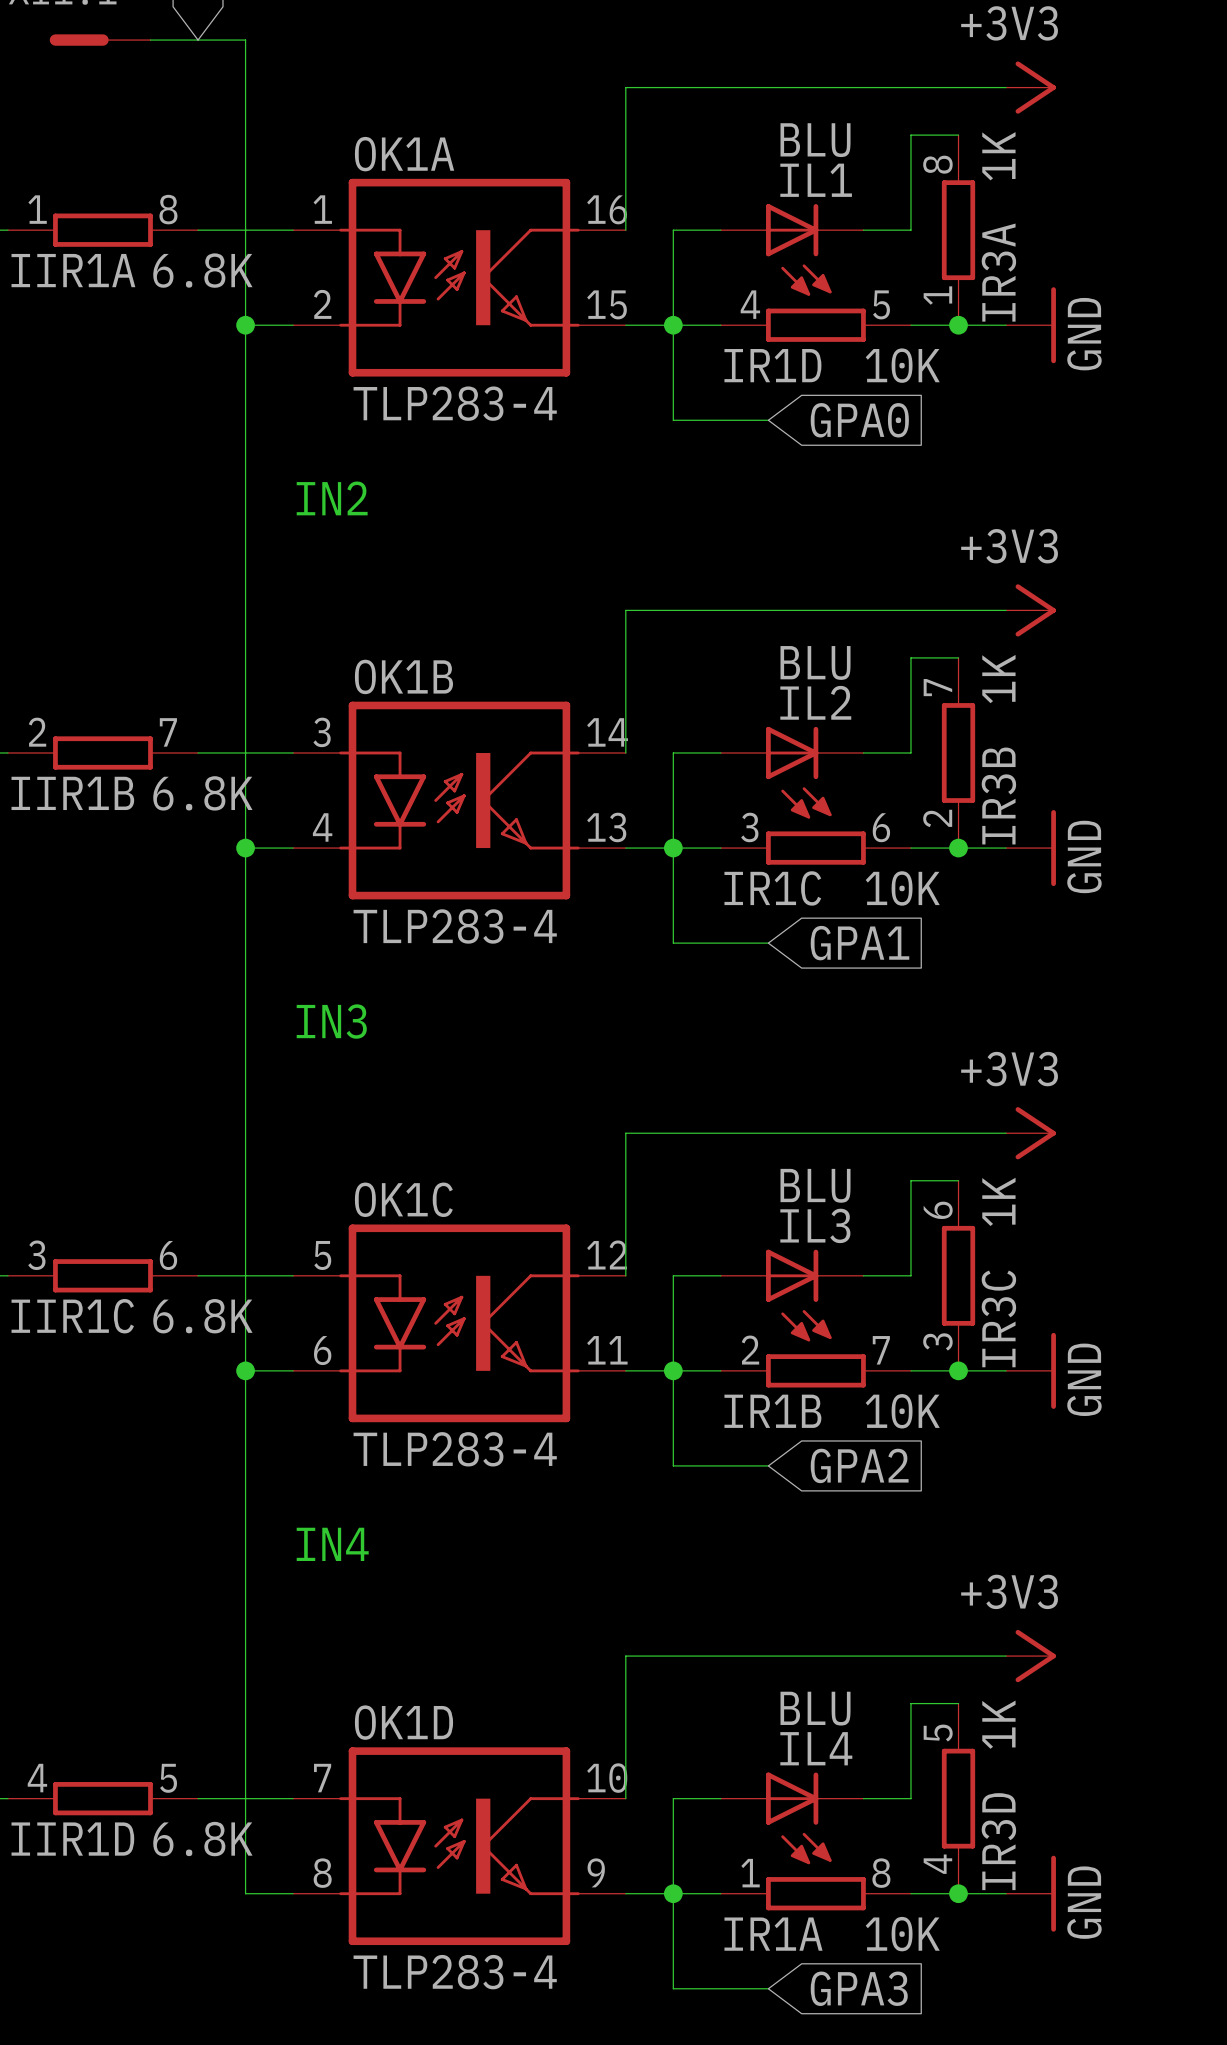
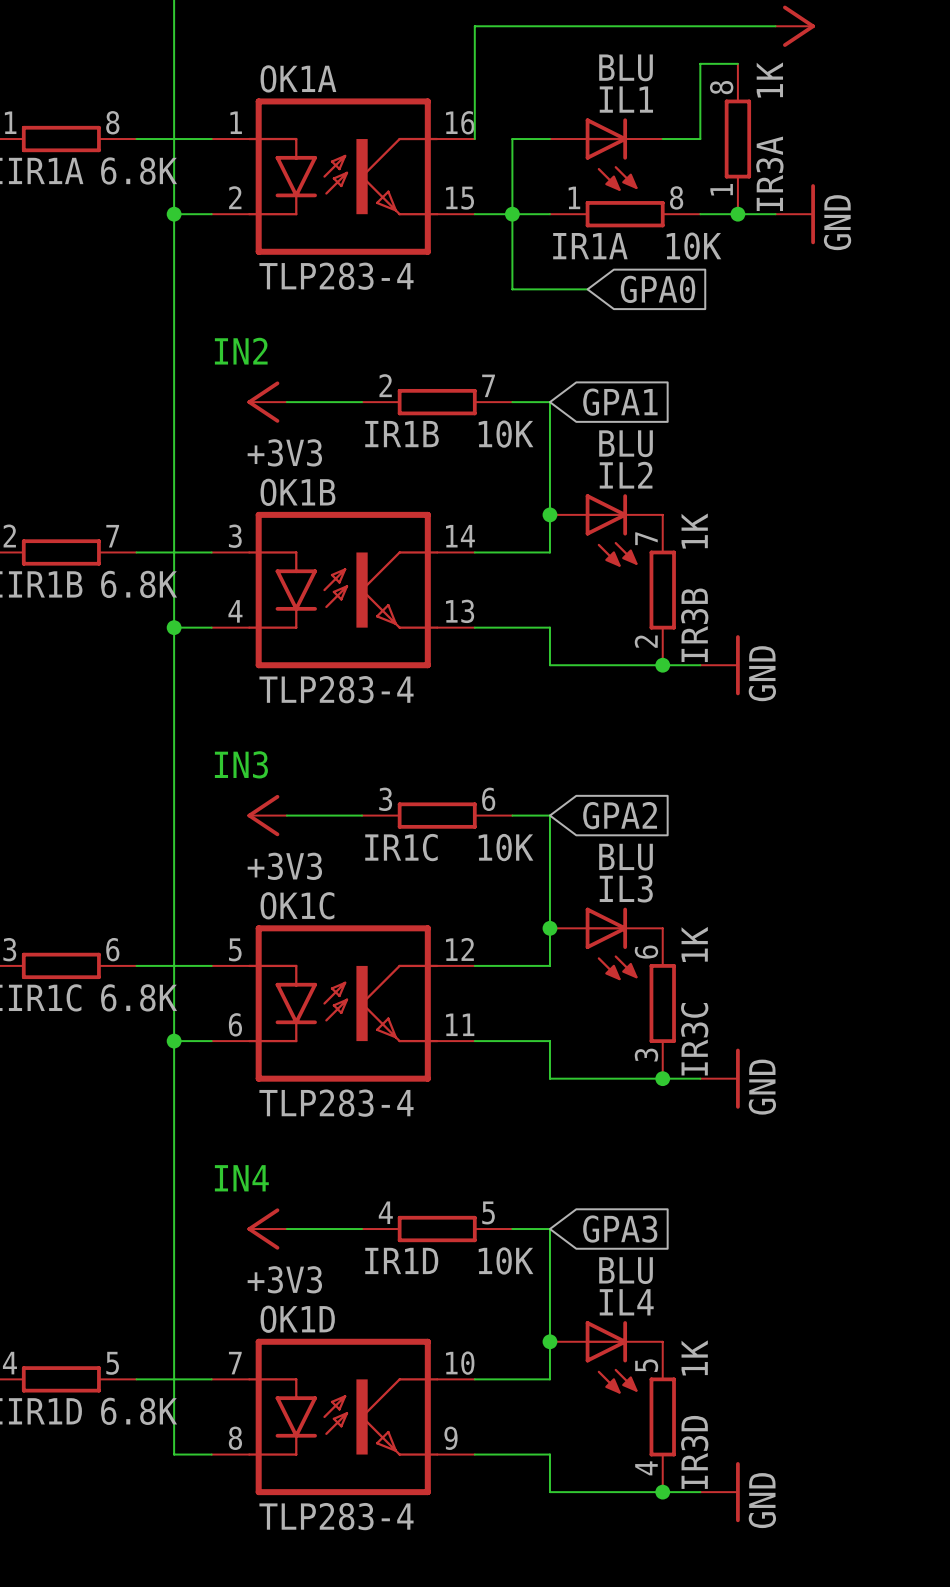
IR1D position: (815, 325) -> (437, 1229)
power symbol: none -> +3V3 (267, 402)
wire: none -> (286, 402) (362, 402)
wire: none -> (512, 402) (549, 402) (549, 552)
wire: (1006, 610) (625, 610) (625, 752) -> none
power symbol: +3V3 (1030, 610) -> none
wire: (958, 657) (910, 657) (910, 752) (863, 752) -> none
junction: none -> (549, 514)
wire: (673, 752) (673, 943) (768, 943) -> (512, 552) (474, 552)
IR3B position: (958, 752) -> (662, 590)
IL2 position: (792, 772) -> (606, 530)
junction: (673, 848) -> none
wire: none -> (549, 627) (549, 665) (700, 665)
IR1C position: (815, 848) -> (437, 815)
wire: (910, 848) (1006, 848) -> none
junction: (958, 848) -> none
power symbol position: GND (1030, 848) -> GND (720, 665)
junction: none -> (662, 665)
global label position: GPA1 (859, 943) -> GPA1 (620, 402)
power symbol: none -> +3V3 (267, 815)
wire: none -> (286, 815) (362, 815)
wire: none -> (512, 815) (549, 815) (549, 965)
wire: (1006, 1133) (625, 1133) (625, 1275) -> none
power symbol: +3V3 (1030, 1133) -> none
wire: (958, 1180) (910, 1180) (910, 1275) (863, 1275) -> none
junction: none -> (549, 928)
wire: (673, 1275) (673, 1465) (768, 1465) -> (512, 965) (474, 965)
IR3C position: (958, 1275) -> (662, 1003)
IL3 position: (792, 1295) -> (606, 943)
junction: (673, 1370) -> none
wire: none -> (549, 1041) (549, 1078) (700, 1078)
IR1B position: (815, 1370) -> (437, 402)
wire: (910, 1370) (1006, 1370) -> none
junction: (958, 1370) -> none
power symbol position: GND (1030, 1370) -> GND (720, 1078)
junction: none -> (662, 1078)
global label position: GPA2 (859, 1465) -> GPA2 (620, 815)
power symbol: none -> +3V3 (267, 1229)
wire: none -> (286, 1229) (362, 1229)
wire: none -> (512, 1229) (549, 1229) (549, 1379)
wire: (1006, 1656) (625, 1656) (625, 1798) -> none
power symbol: +3V3 (1030, 1656) -> none
wire: (958, 1703) (910, 1703) (910, 1798) (863, 1798) -> none
junction: none -> (549, 1341)
wire: (673, 1798) (673, 1988) (768, 1988) -> (512, 1379) (474, 1379)
IR3D position: (958, 1798) -> (662, 1416)
IL4 position: (792, 1818) -> (606, 1357)
junction: (673, 1893) -> none
wire: none -> (549, 1454) (549, 1492) (700, 1492)
IR1A position: (815, 1893) -> (625, 214)
wire: (910, 1893) (1006, 1893) -> none
junction: (958, 1893) -> none
power symbol position: GND (1030, 1893) -> GND (720, 1492)
junction: none -> (662, 1492)
global label position: GPA3 (859, 1988) -> GPA3 (620, 1229)

